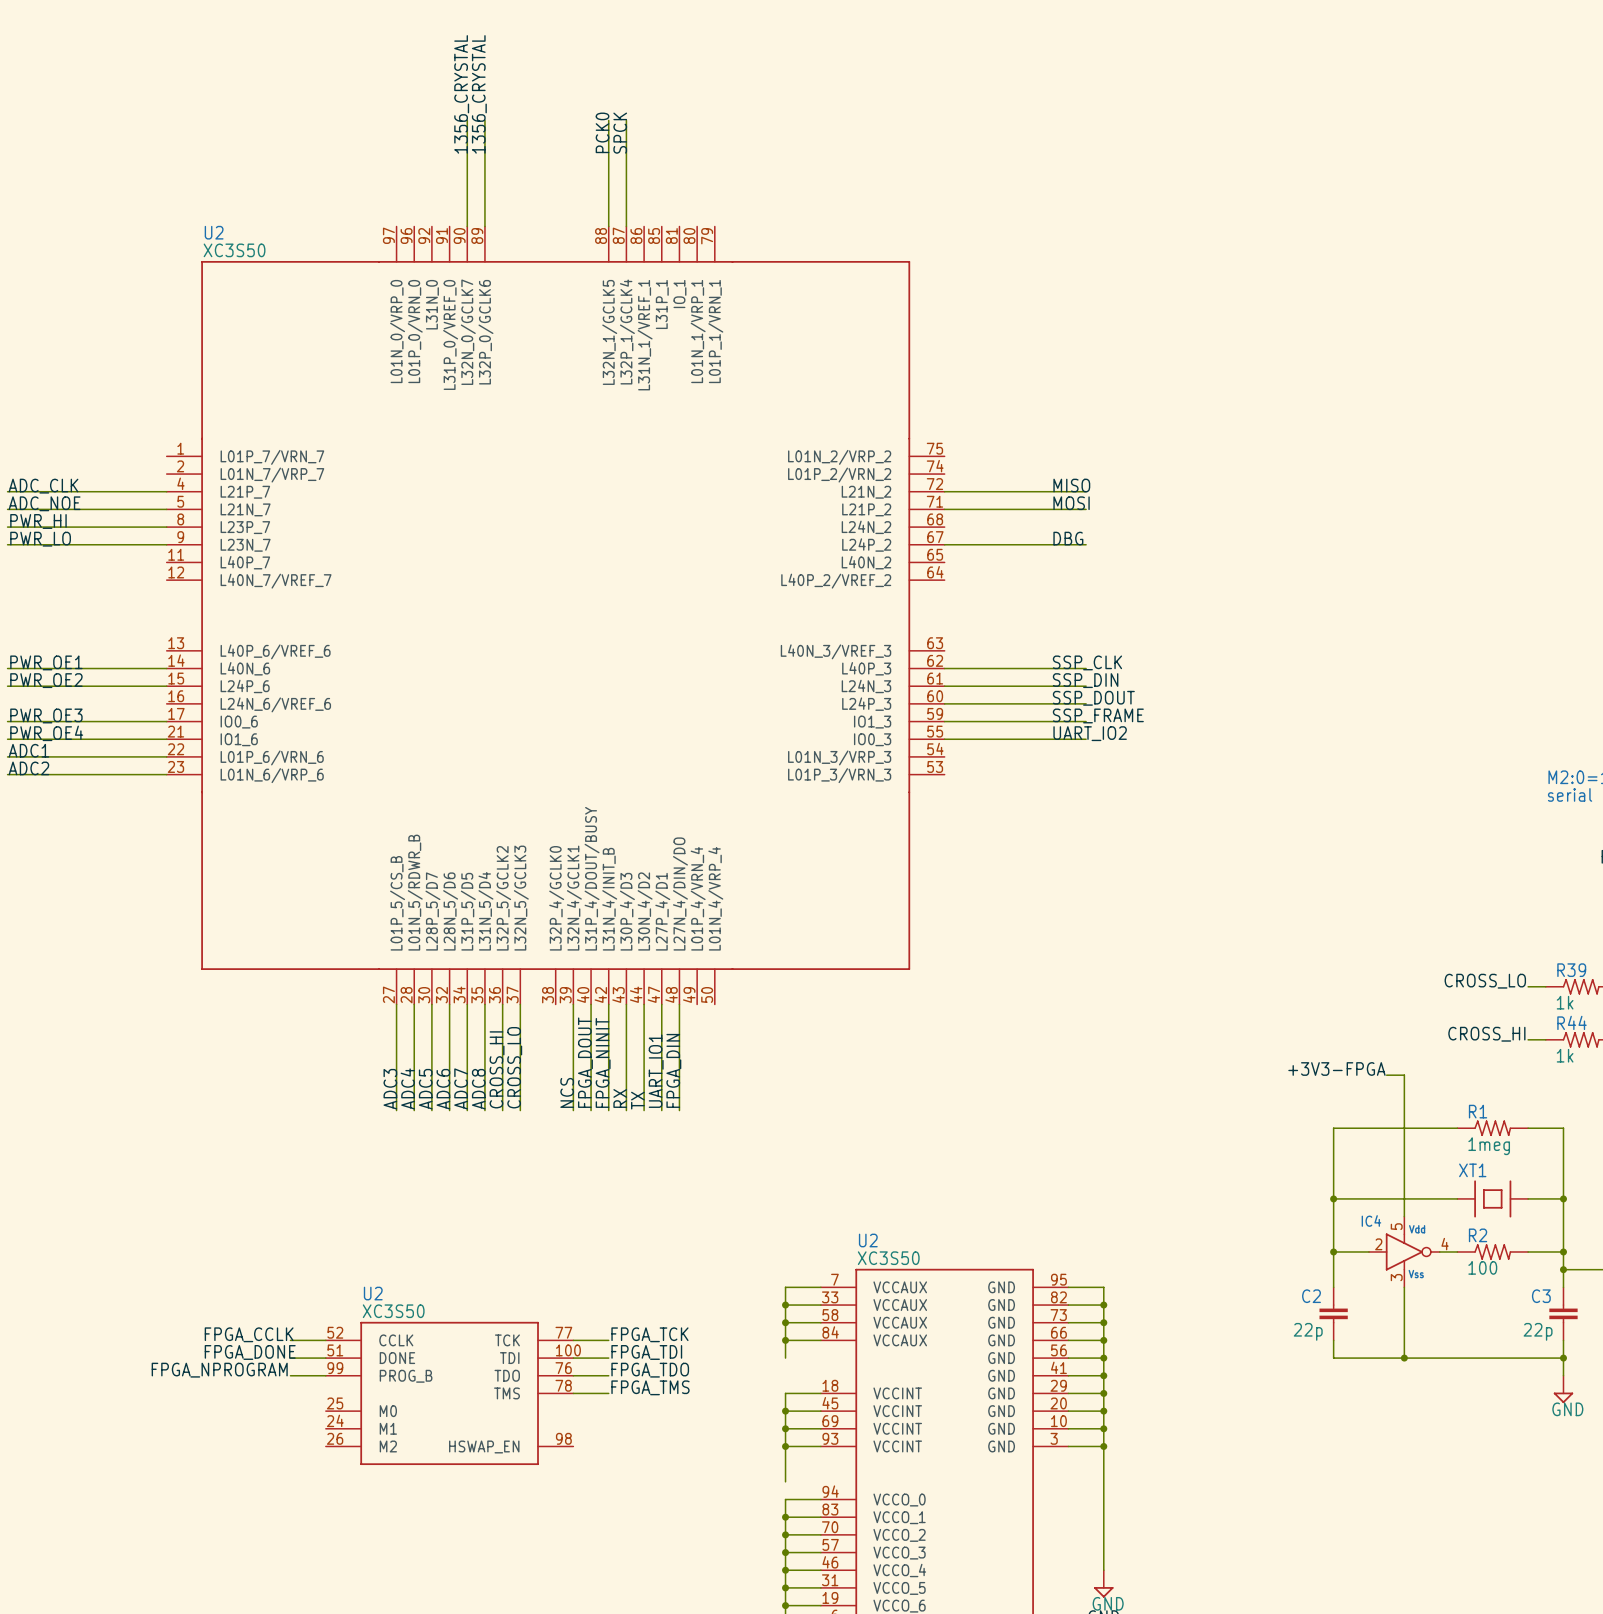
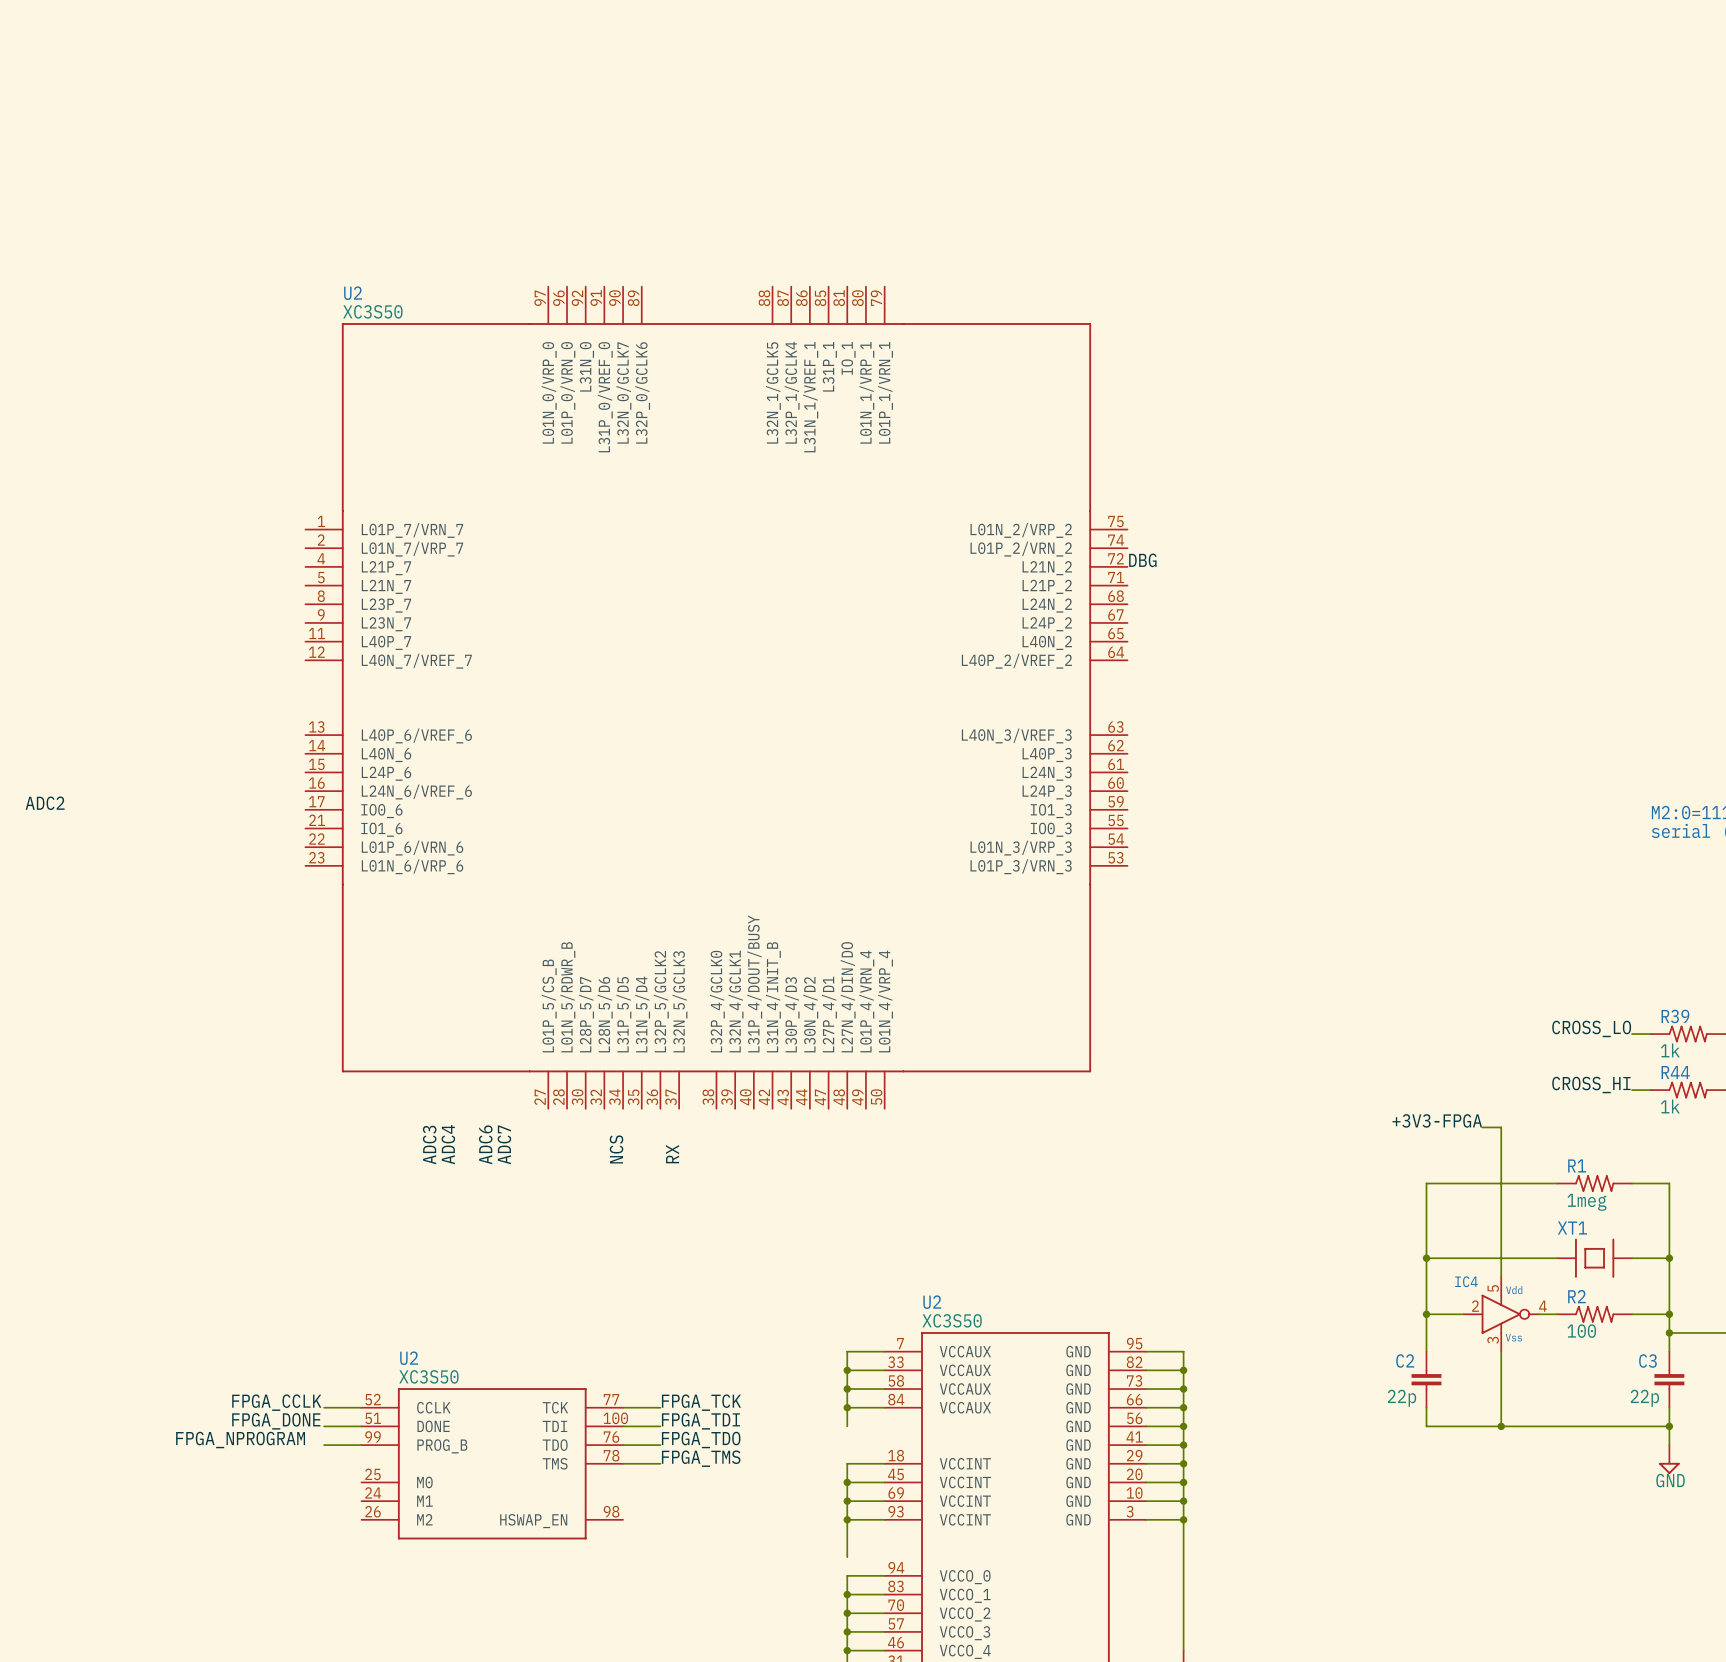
label: 1356_CRYSTAL (461, 94) -> none
label: 1356_CRYSTAL (479, 94) -> none
wire: (467, 120) (467, 226) -> none
wire: (484, 120) (484, 226) -> none
wire: (608, 120) (608, 226) -> none
wire: (626, 120) (626, 226) -> none
label: PCK0 (602, 132) -> none
label: SPCK (620, 133) -> none
label: MISO (1071, 485) -> none
label: ADC_CLK (43, 486) -> none
wire: (7, 491) (166, 491) -> none
wire: (944, 491) (1086, 491) -> none
label: ADC_NOE (44, 503) -> none
label: MOSI (1071, 503) -> none
wire: (7, 509) (166, 509) -> none
wire: (944, 509) (1086, 509) -> none
label: PWR_HI (38, 521) -> none
wire: (7, 527) (166, 527) -> none
label: PWR_LO (40, 539) -> none
wire: (7, 544) (166, 544) -> none
wire: (944, 544) (1086, 544) -> none
U2 position: (555, 615) -> (716, 697)
label: PWR_OE1 (46, 662) -> none
label: SSP_CLK (1087, 662) -> none
wire: (7, 668) (166, 668) -> none
wire: (944, 668) (1086, 668) -> none
label: PWR_OE2 (46, 680) -> none
label: SSP_DIN (1085, 680) -> none
wire: (7, 686) (166, 686) -> none
wire: (944, 686) (1086, 686) -> none
label: SSP_DOUT (1093, 698) -> none
wire: (944, 703) (1086, 703) -> none
label: PWR_OE3 (46, 715) -> none
label: SSP_FRAME (1098, 715) -> none
wire: (7, 721) (166, 721) -> none
wire: (944, 721) (1086, 721) -> none
label: PWR_OE4 (46, 733) -> none
label: UART_IO2 (1090, 733) -> none
wire: (7, 739) (166, 739) -> none
wire: (944, 739) (1086, 739) -> none
label: ADC1 (28, 750) -> none
wire: (7, 756) (166, 756) -> none
wire: (7, 774) (166, 774) -> none
wire: (396, 1004) (396, 1110) -> none
wire: (414, 1004) (414, 1110) -> none
wire: (431, 1004) (431, 1110) -> none
wire: (449, 1004) (449, 1110) -> none
wire: (467, 1004) (467, 1110) -> none
wire: (484, 1004) (484, 1110) -> none
wire: (502, 1004) (502, 1110) -> none
wire: (520, 1004) (520, 1110) -> none
wire: (573, 1004) (573, 1110) -> none
wire: (591, 1004) (591, 1110) -> none
wire: (608, 1004) (608, 1110) -> none
wire: (626, 1004) (626, 1110) -> none
wire: (644, 1004) (644, 1110) -> none
wire: (661, 1004) (661, 1110) -> none
wire: (679, 1004) (679, 1110) -> none
label: FPGA_DOUT (585, 1062) -> none
label: FPGA_NINIT (603, 1062) -> none
label: CROSS_LO (514, 1067) -> none
label: CROSS_HI (497, 1069) -> none
label: FPGA_DIN (673, 1070) -> none
label: UART_IO1 (656, 1071) -> none
label: ADC5 (425, 1089) -> none
label: ADC8 (478, 1089) -> none
label: TX (637, 1100) -> none

